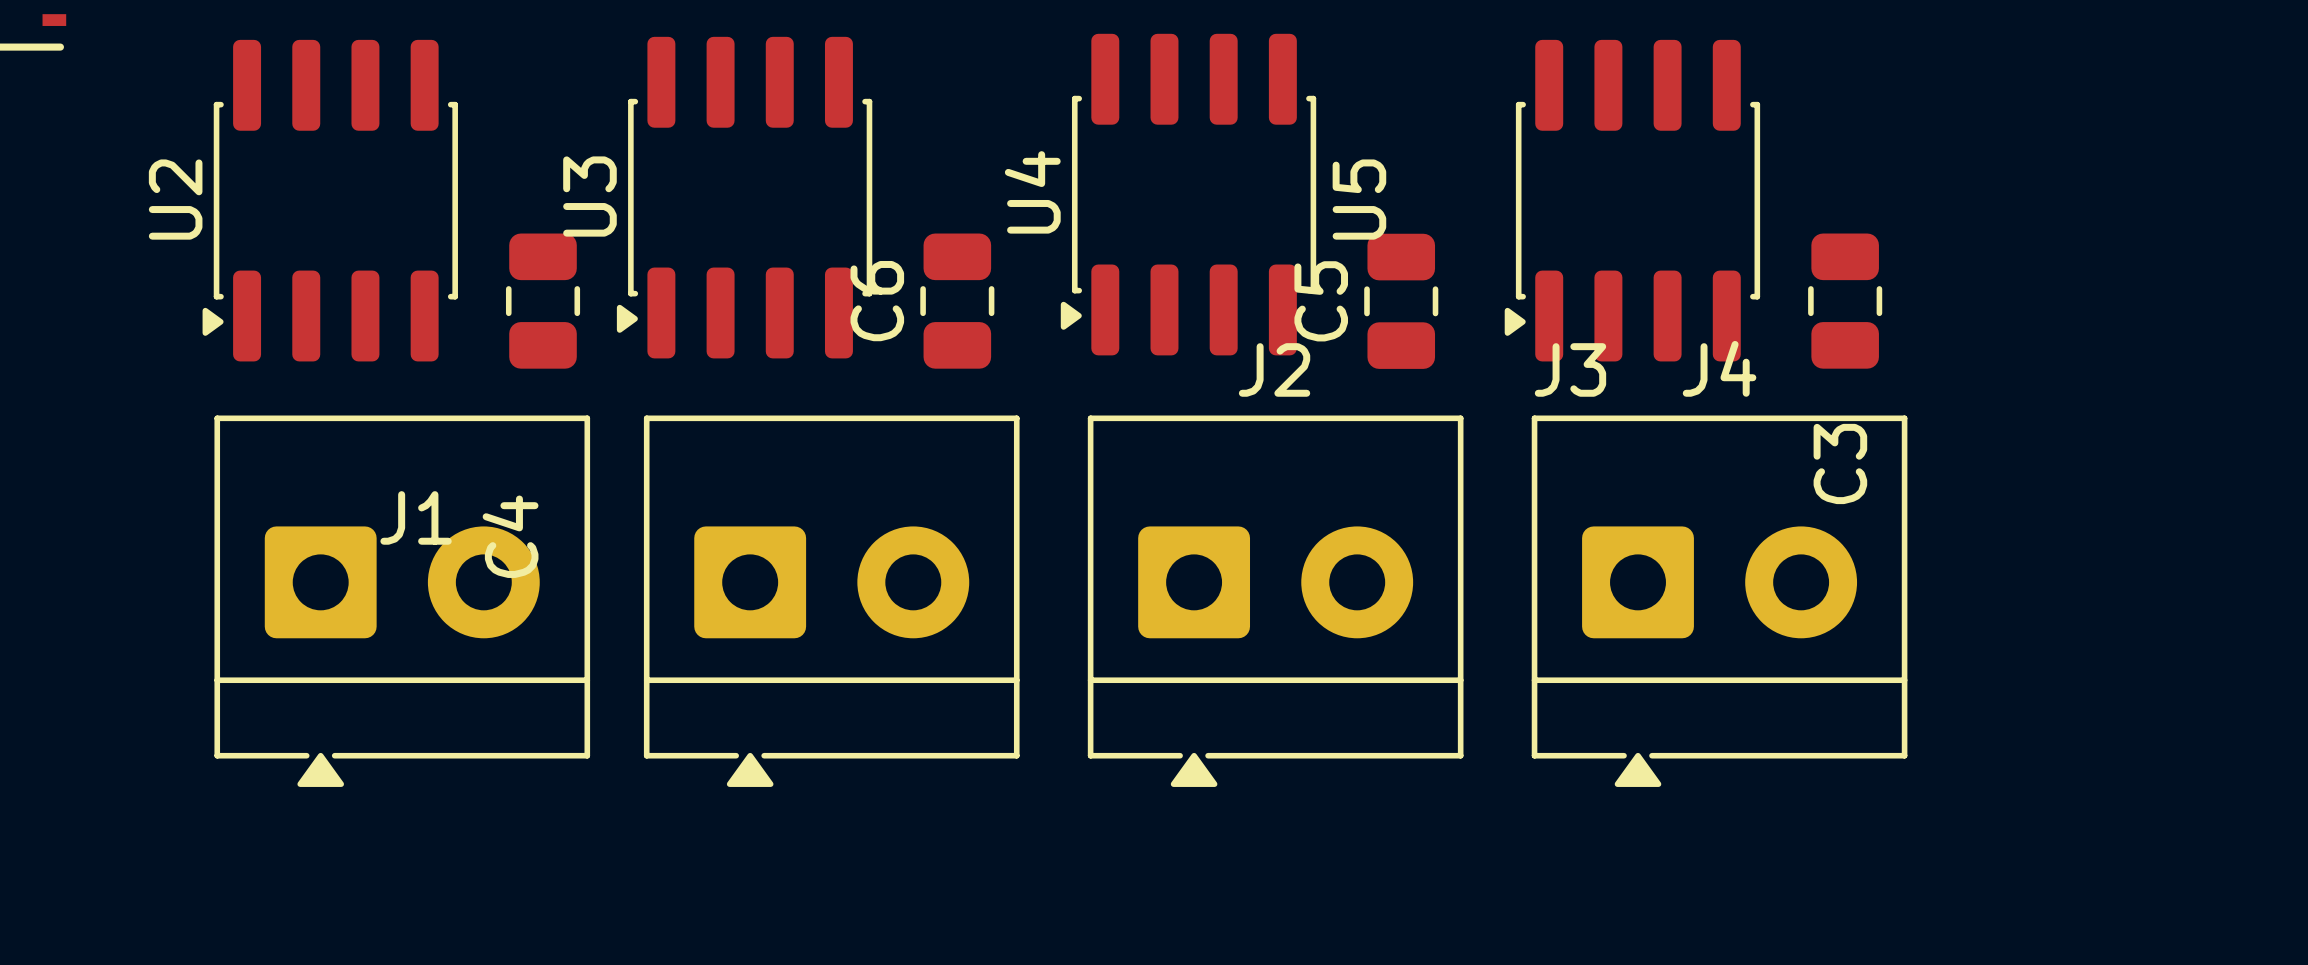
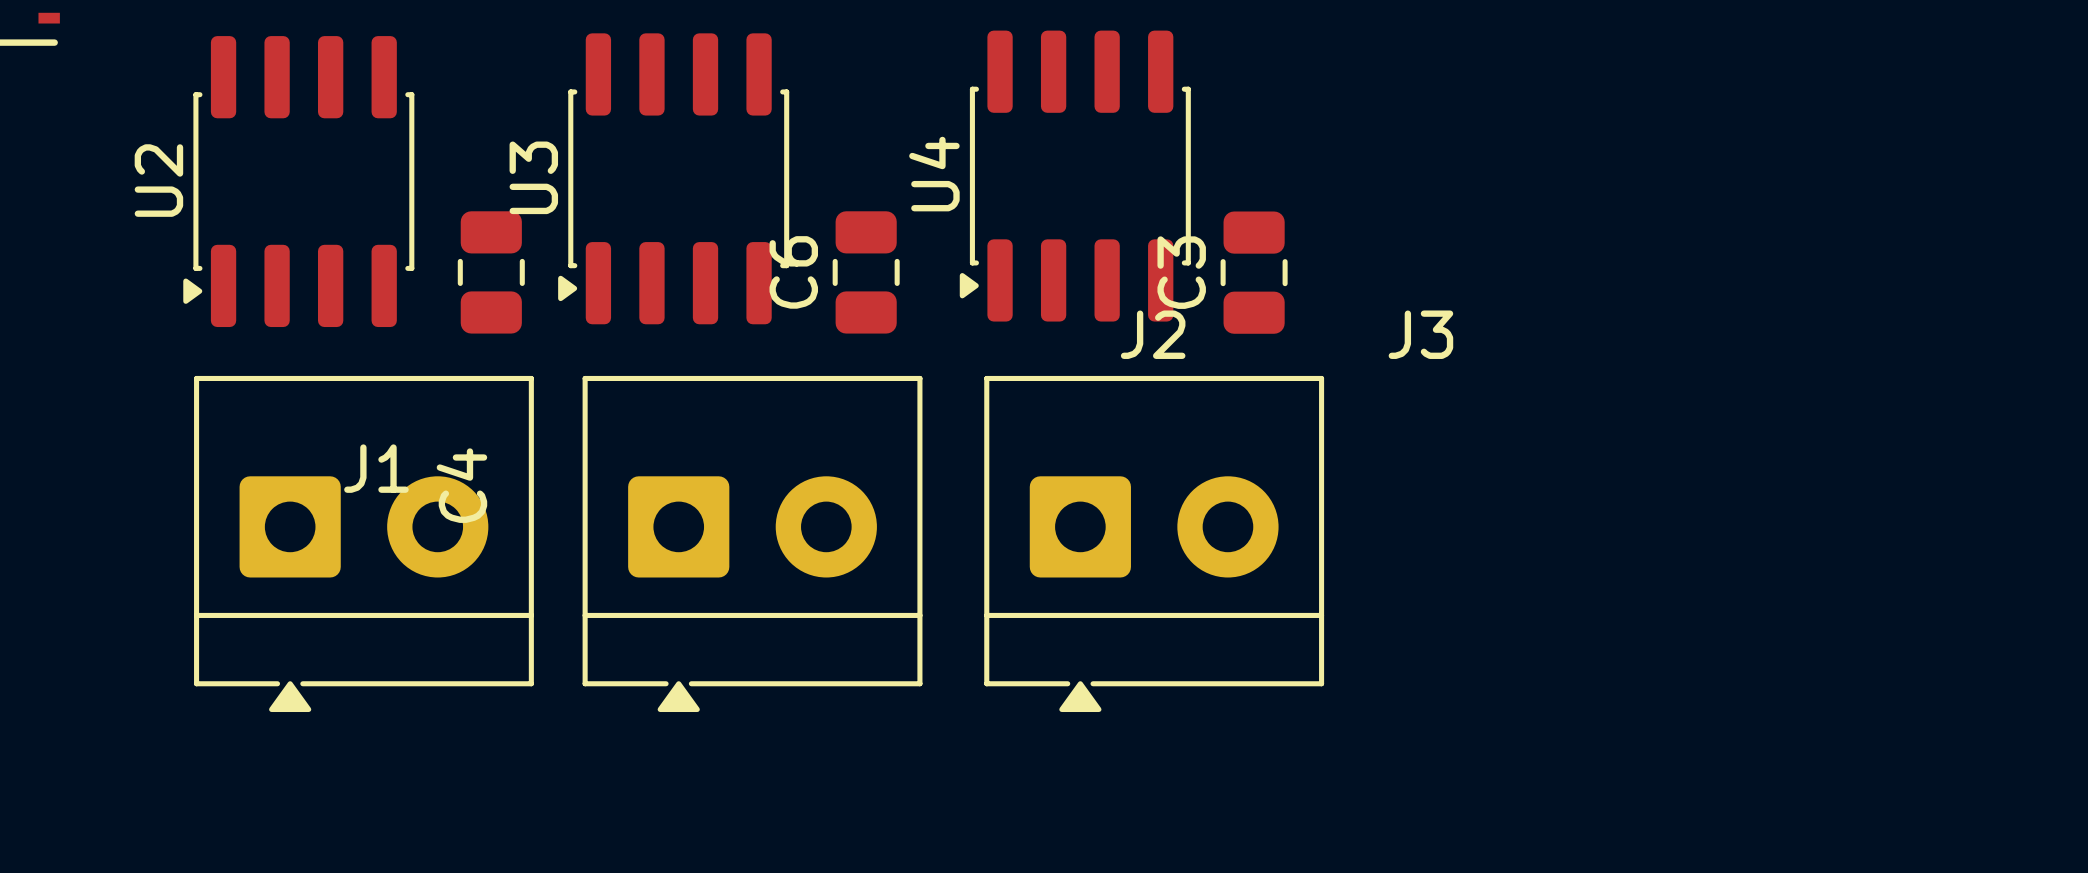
U5: (1632, 200) -> none
C5: (1401, 301) -> none
C3 position: (1845, 301) -> (1254, 272)
C3 name position: C3 (1840, 463) -> C3 (1181, 272)
J4: (1719, 601) -> none

